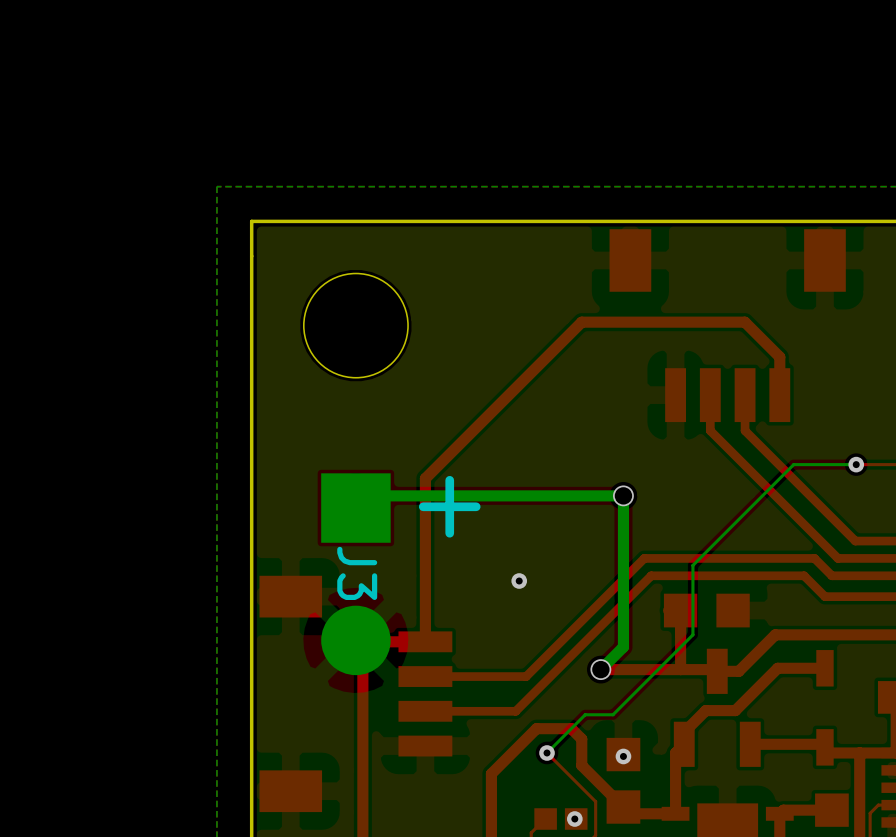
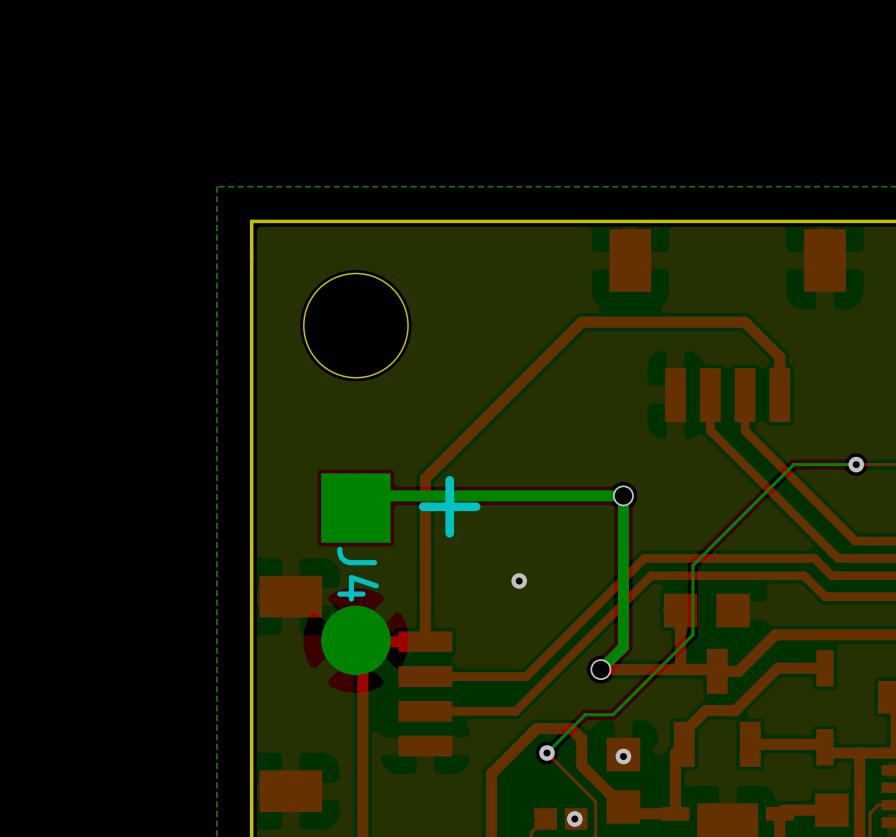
J3 name: J3 (357, 573) -> J4 (358, 574)

